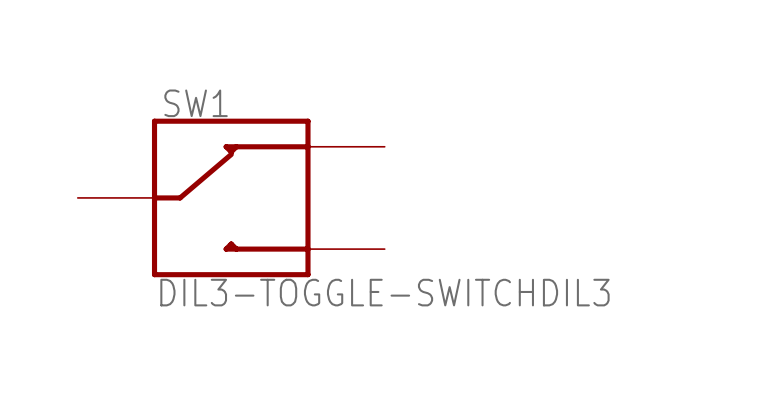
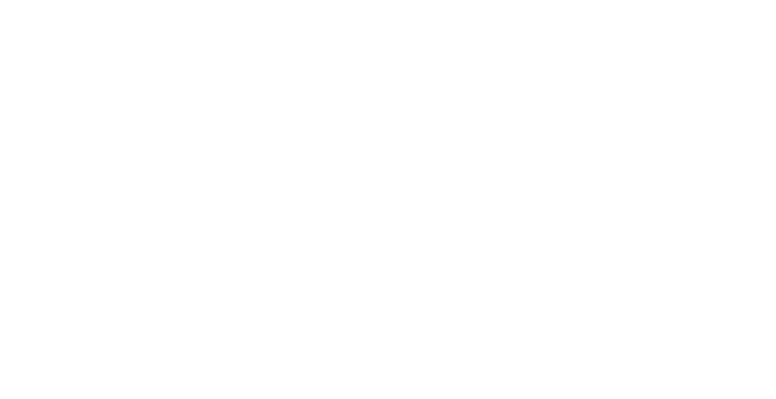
SW1: DIL3-TOGGLE-SWITCHDIL3 (231, 197) -> none

